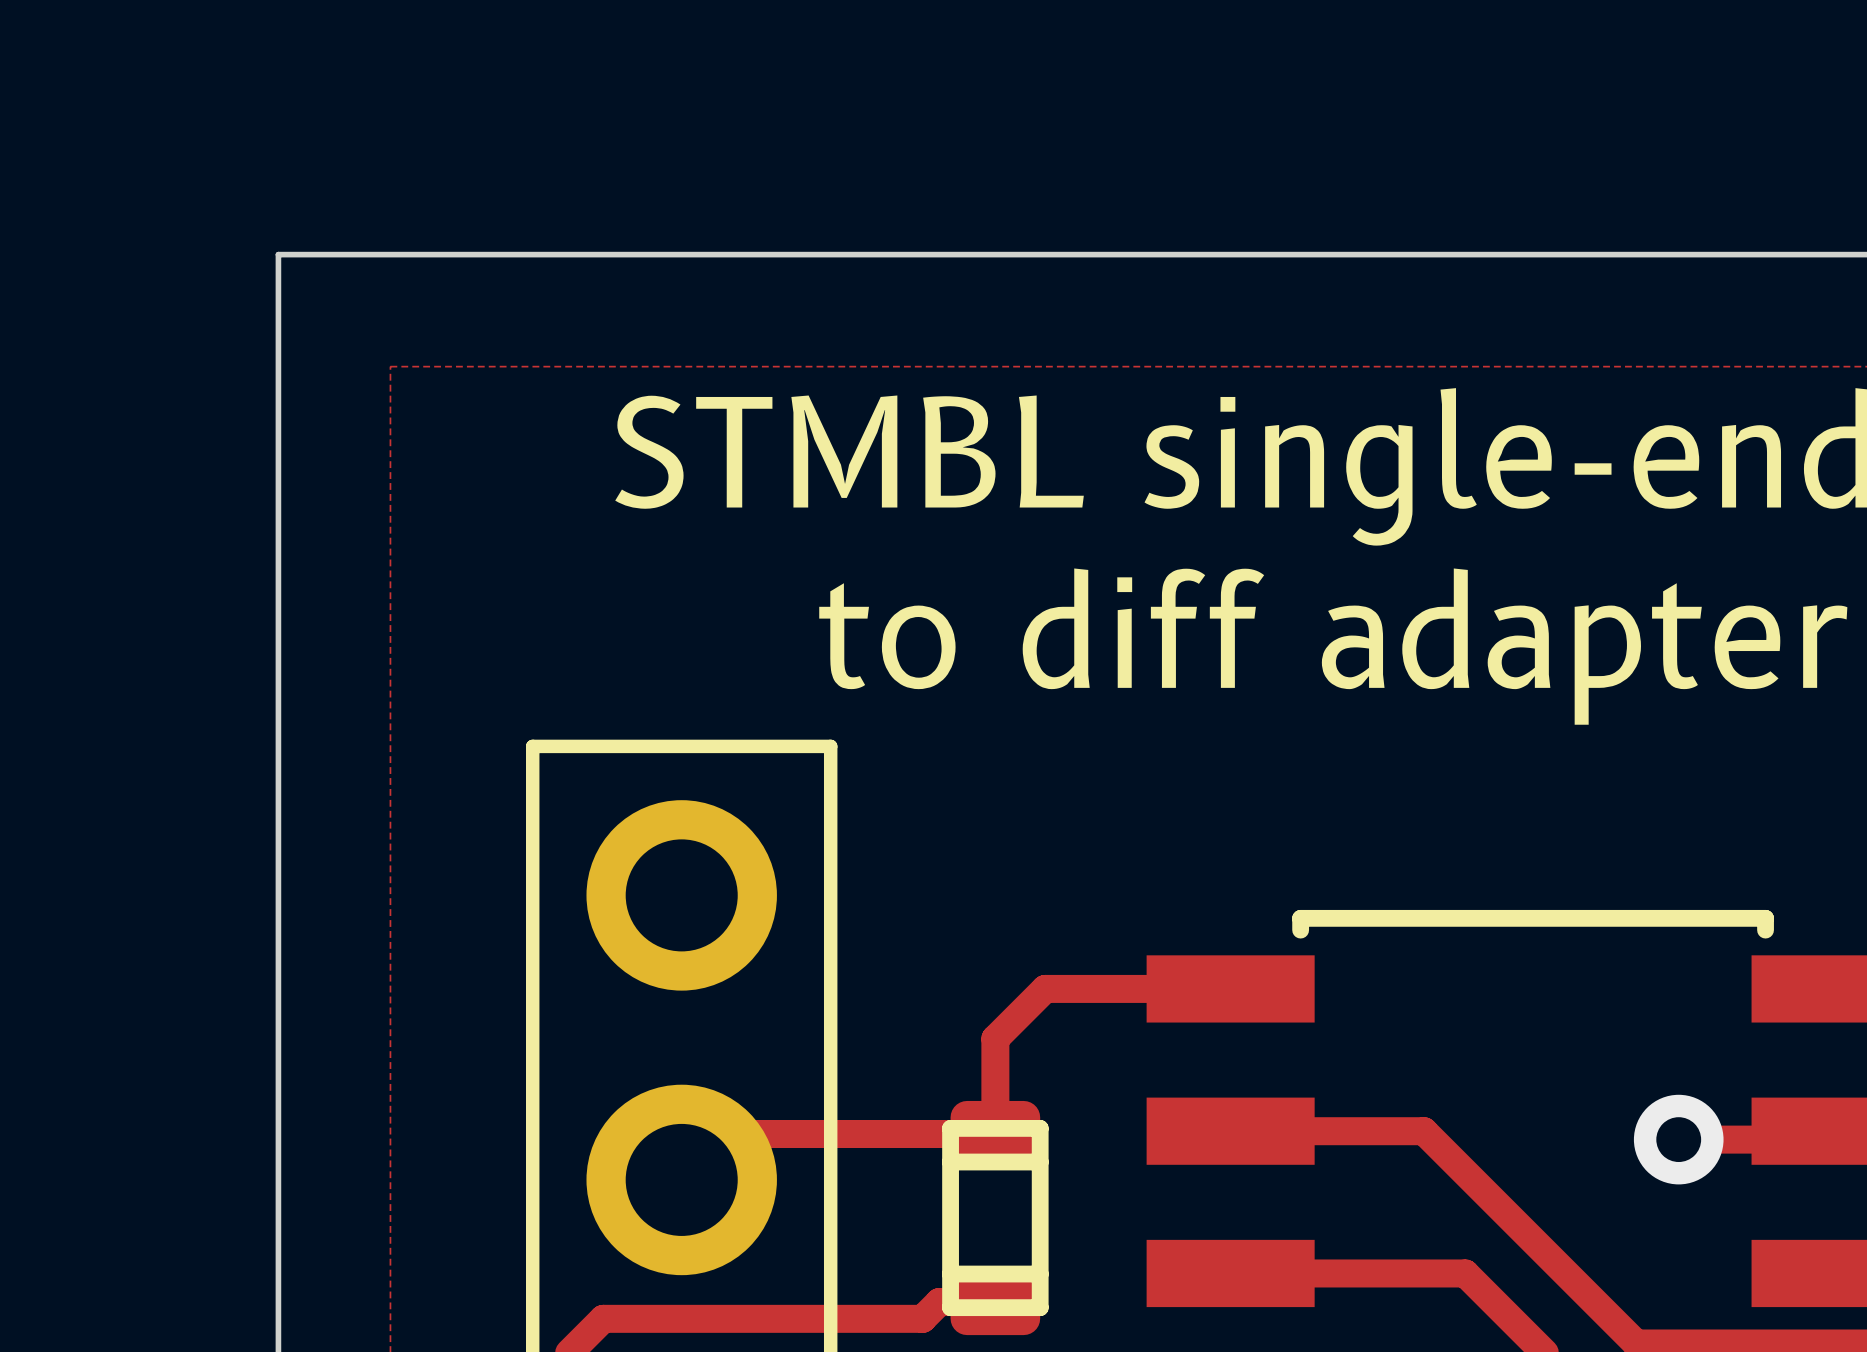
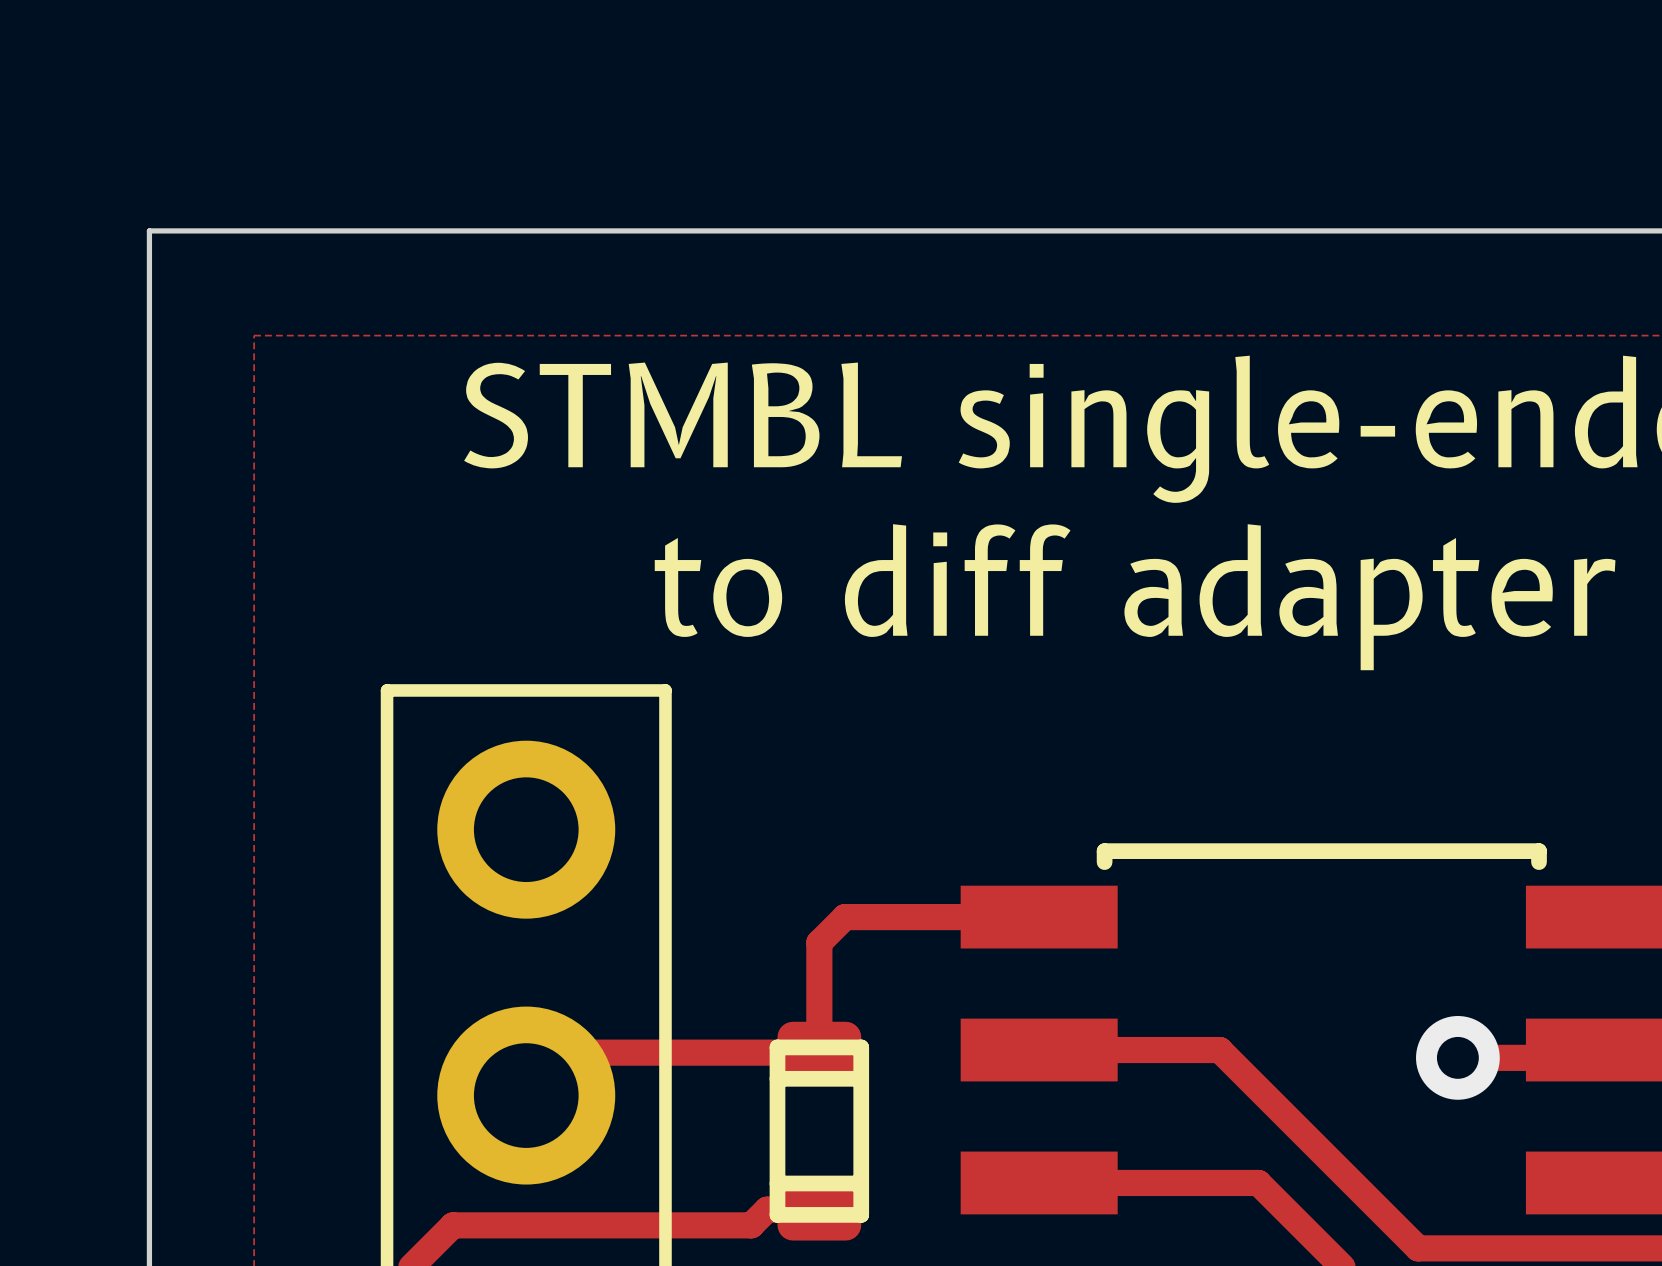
track: (1045, 988) (995, 1038) -> (865, 917) (845, 917) (819, 942) (819, 963)

